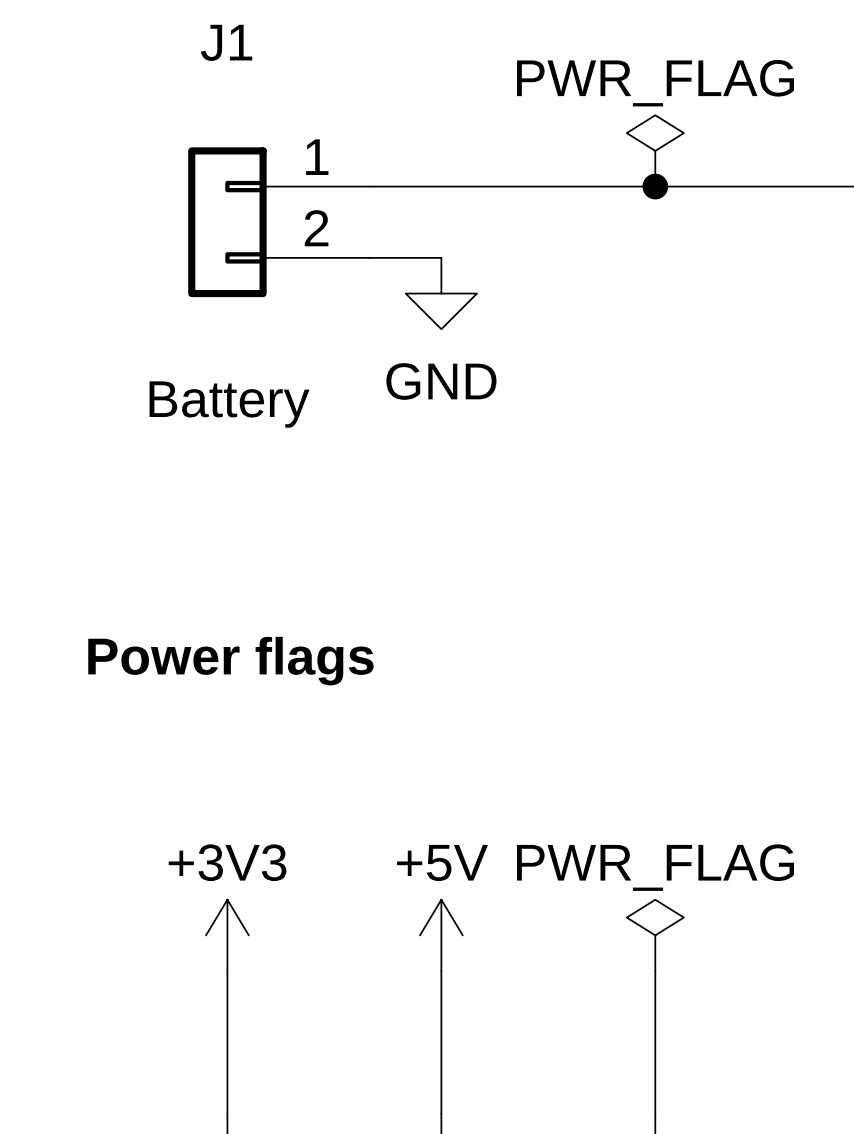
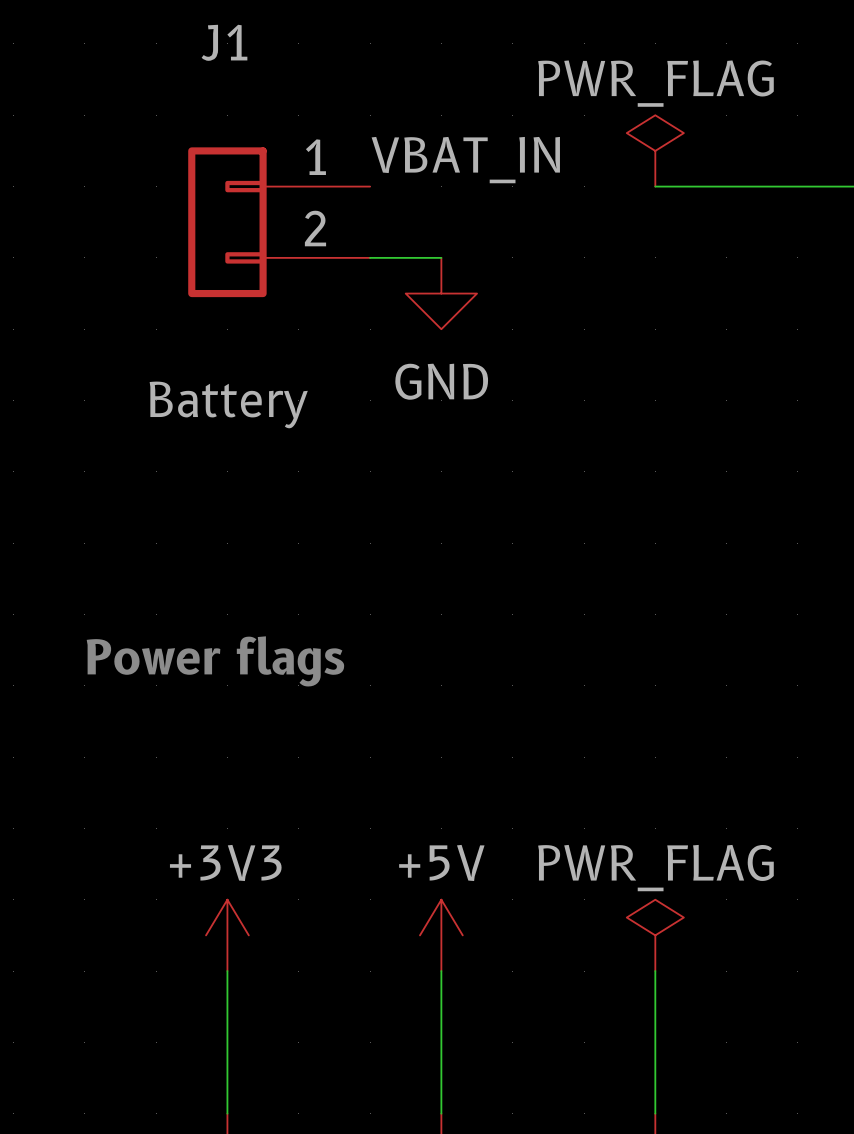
label: none -> VBAT_IN (465, 160)
wire: (370, 186) (655, 186) -> none
junction: (655, 186) -> none

